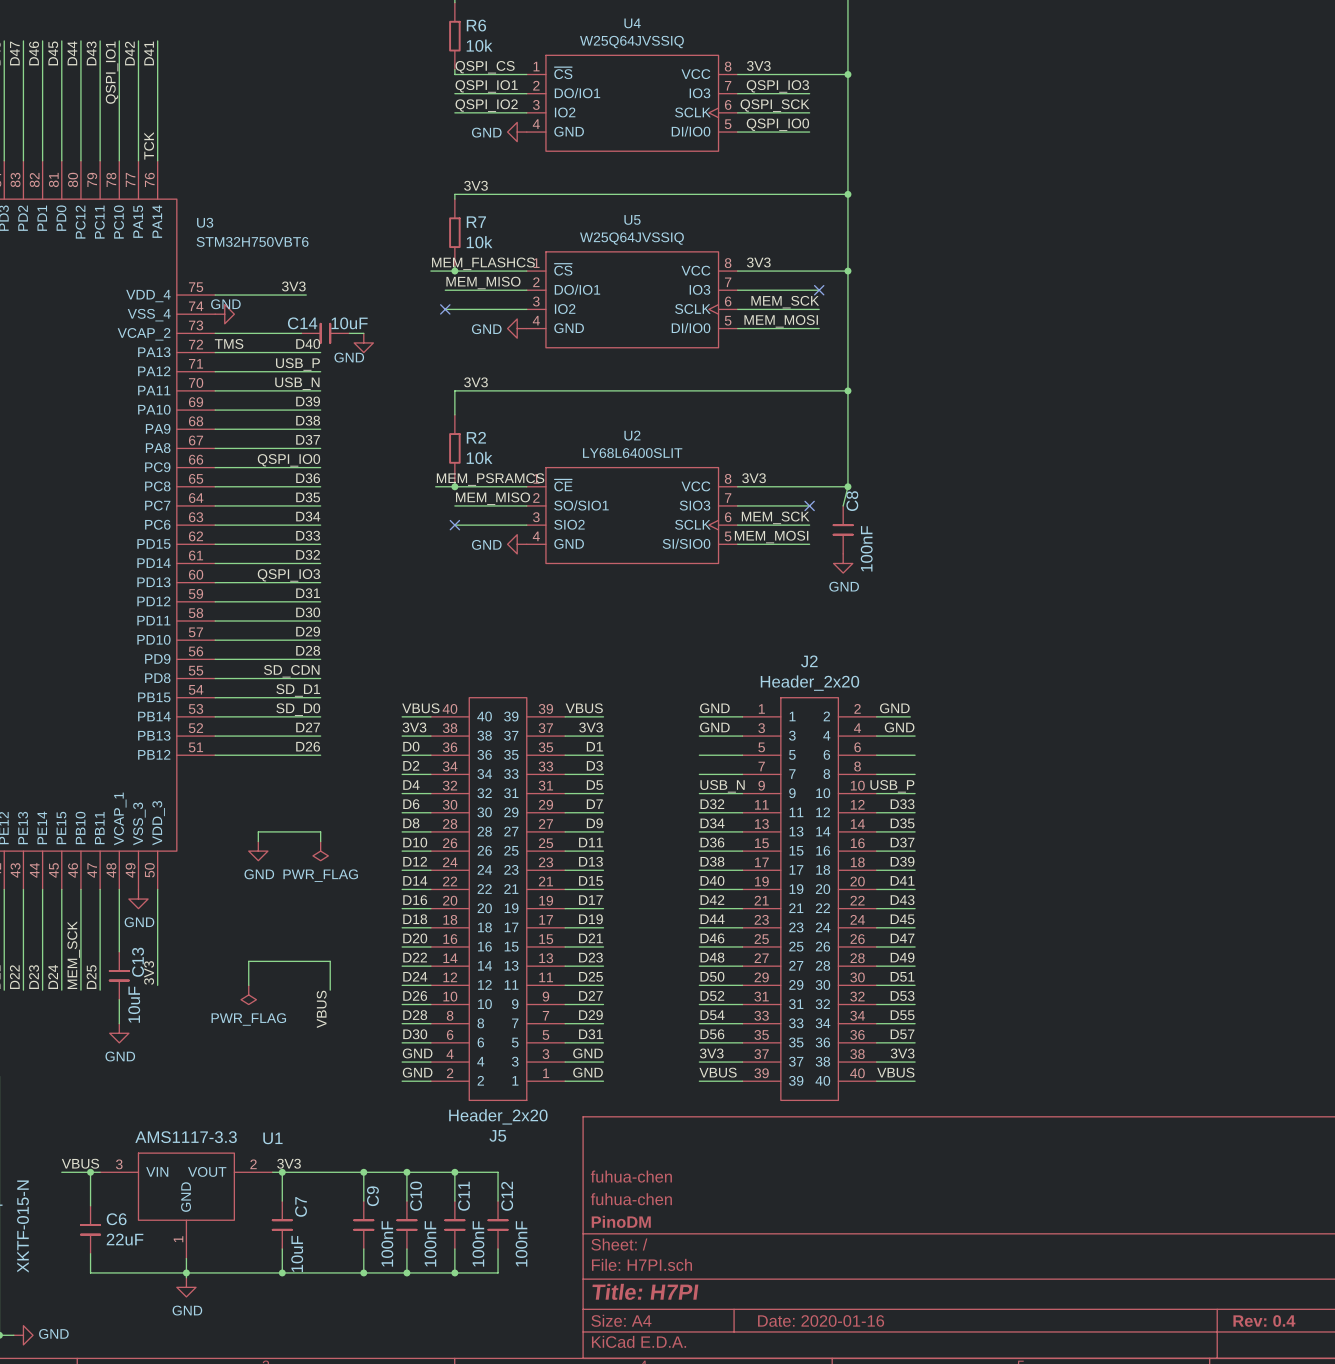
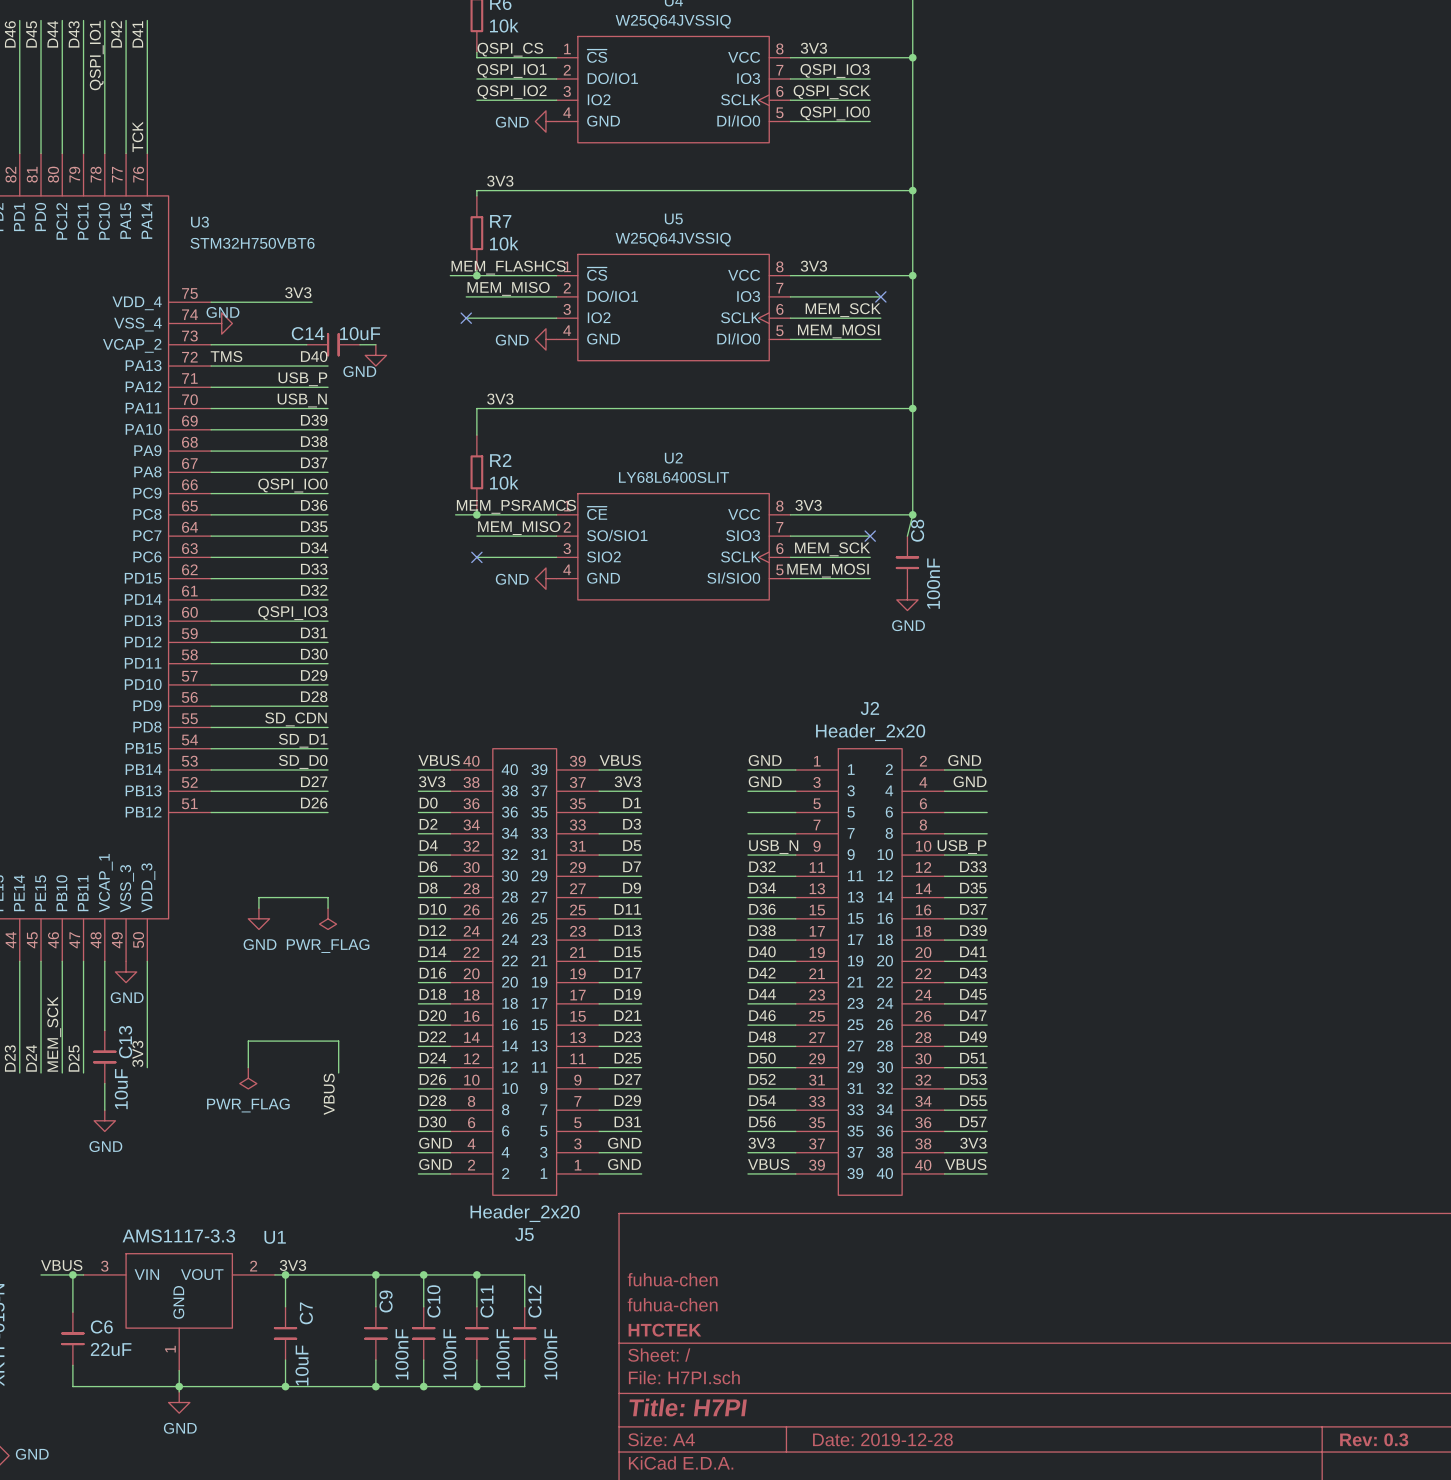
title block: PinoDM (621, 1221) -> HTCTEK (664, 1330)
title block: Date: 2020-01-16 (821, 1320) -> Date: 2019-12-28 (882, 1439)
title block: Rev: 0.4 (1264, 1320) -> Rev: 0.3 (1374, 1439)

